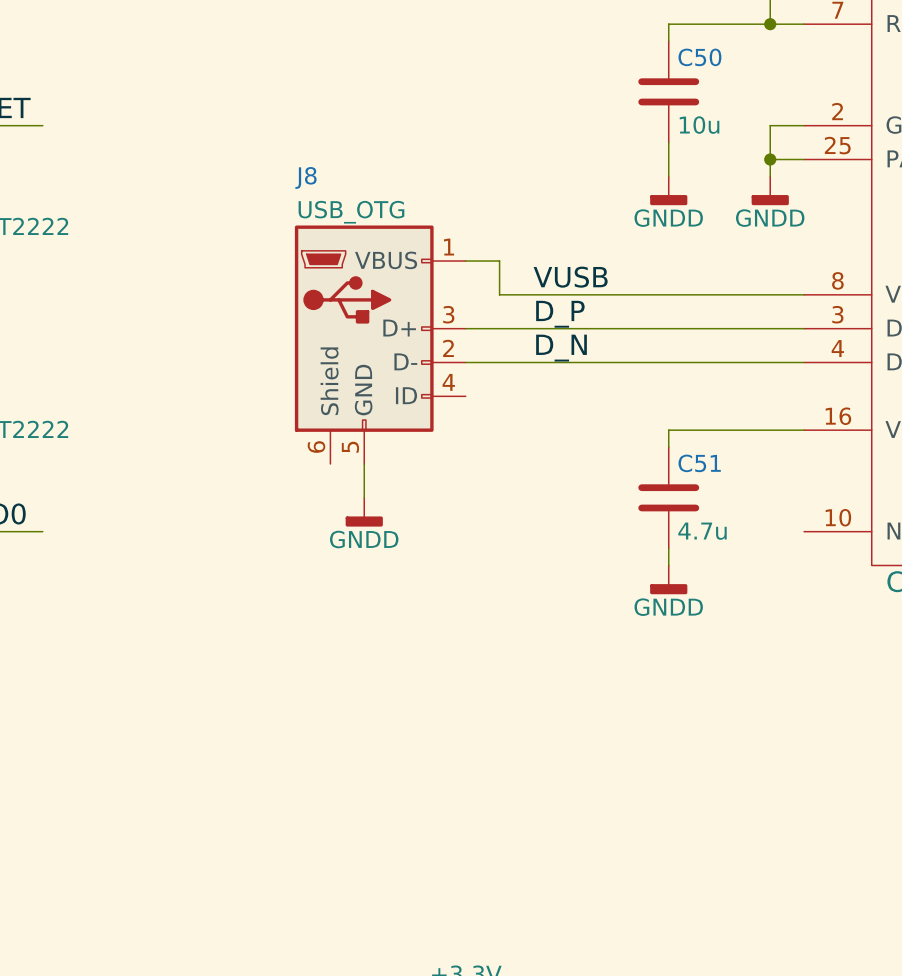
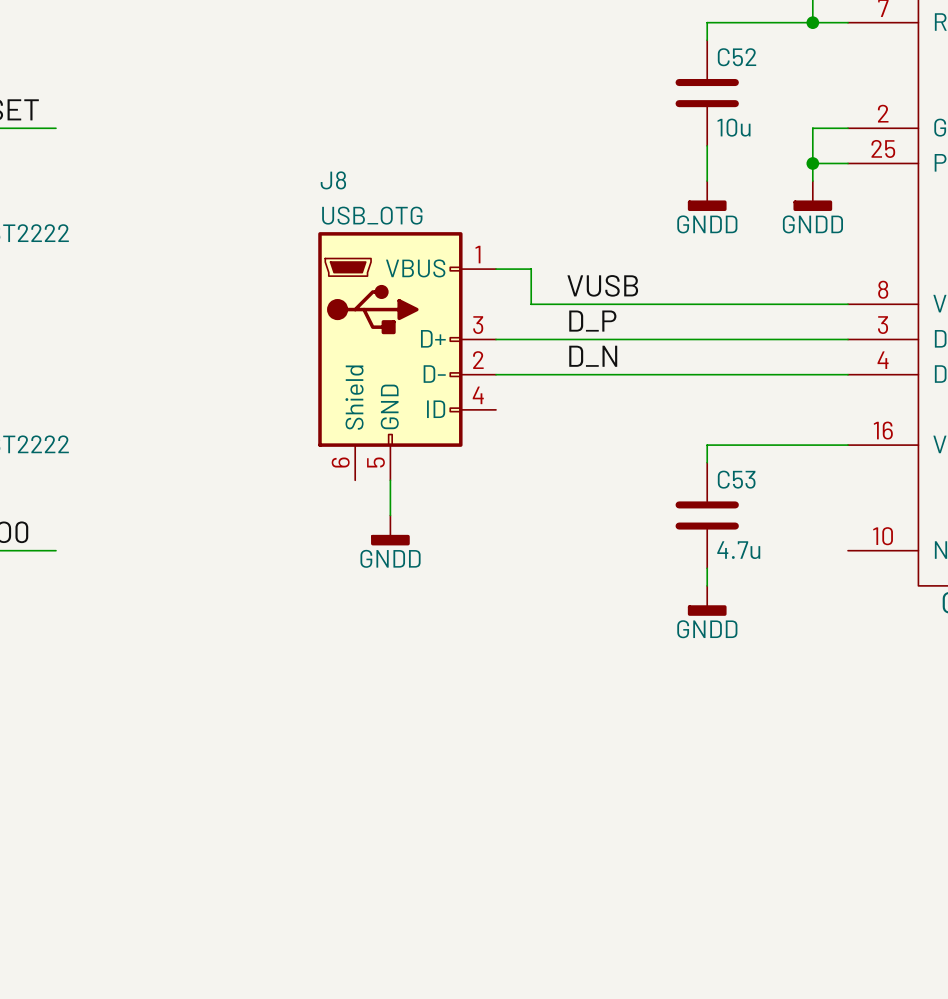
C50 name: C50 (699, 57) -> C52 (737, 57)
C51 name: C51 (699, 463) -> C53 (736, 479)

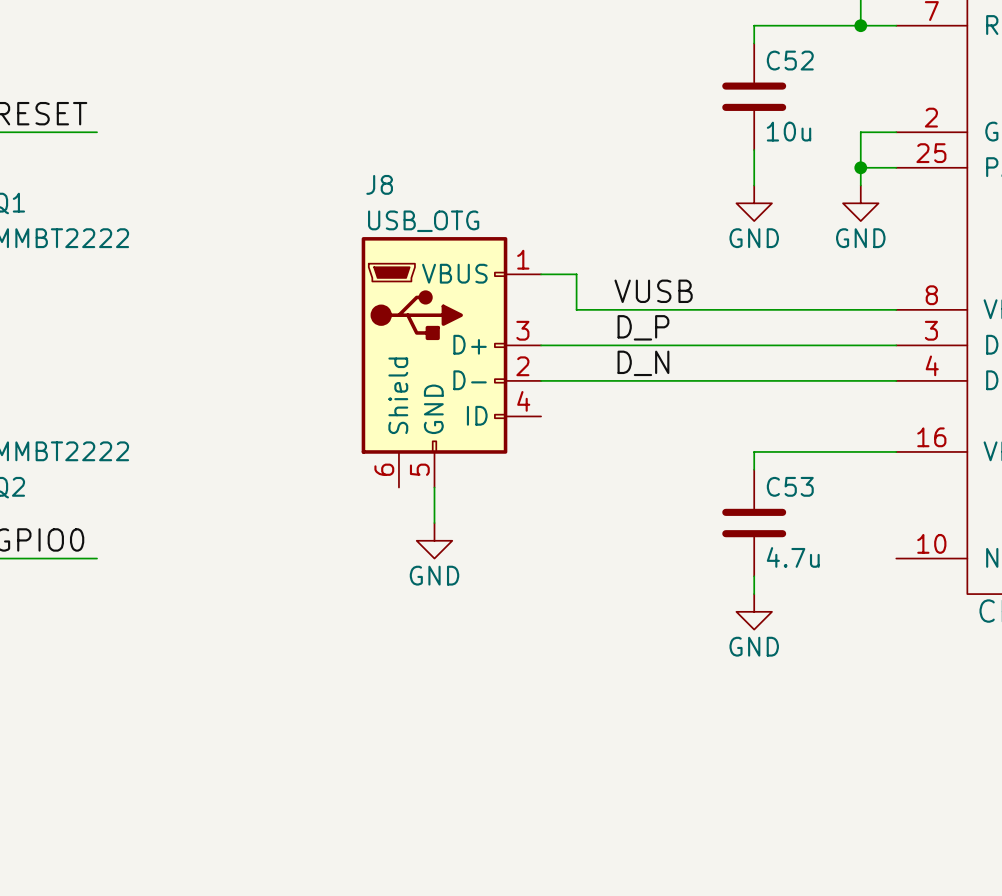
power symbol: GNDD (707, 196) -> GND (754, 203)
power symbol: GNDD (812, 196) -> GND (860, 203)
power symbol: GNDD (390, 530) -> GND (434, 540)
power symbol: GNDD (707, 600) -> GND (754, 611)

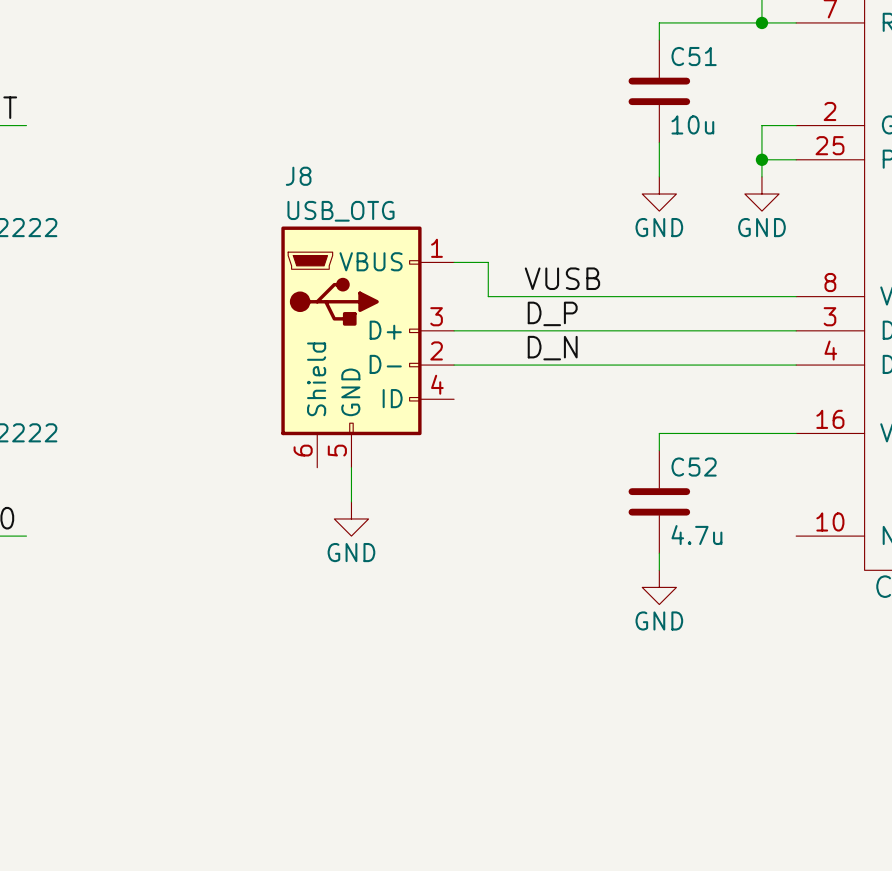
C52 name: C52 (790, 60) -> C51 (694, 56)
C53 name: C53 (790, 486) -> C52 (694, 467)

